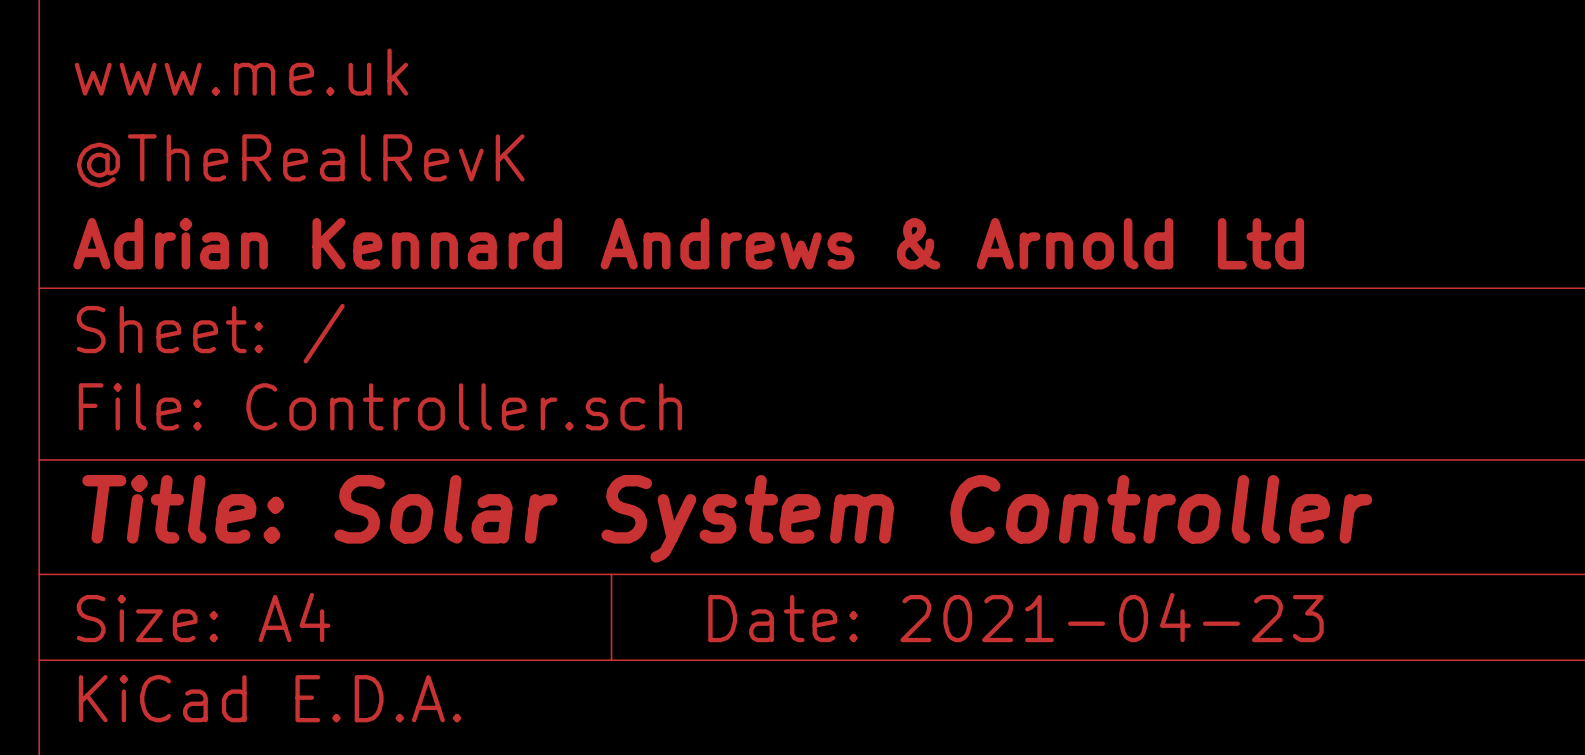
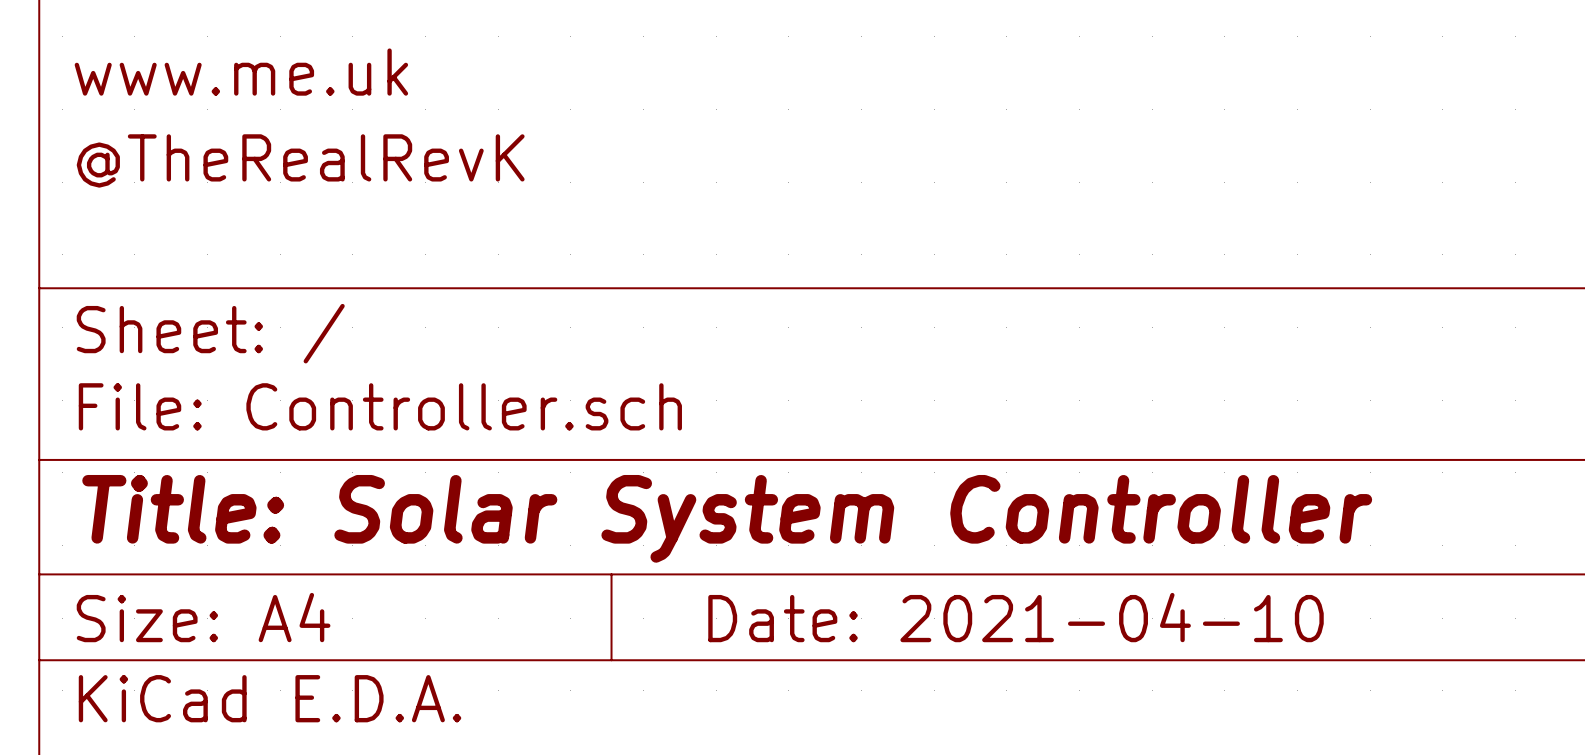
title block: Adrian Kennard Andrews & Arnold Ltd (688, 243) -> none
title block: Date: 2021-04-23 (1016, 617) -> Date: 2021-04-10 (1016, 617)

